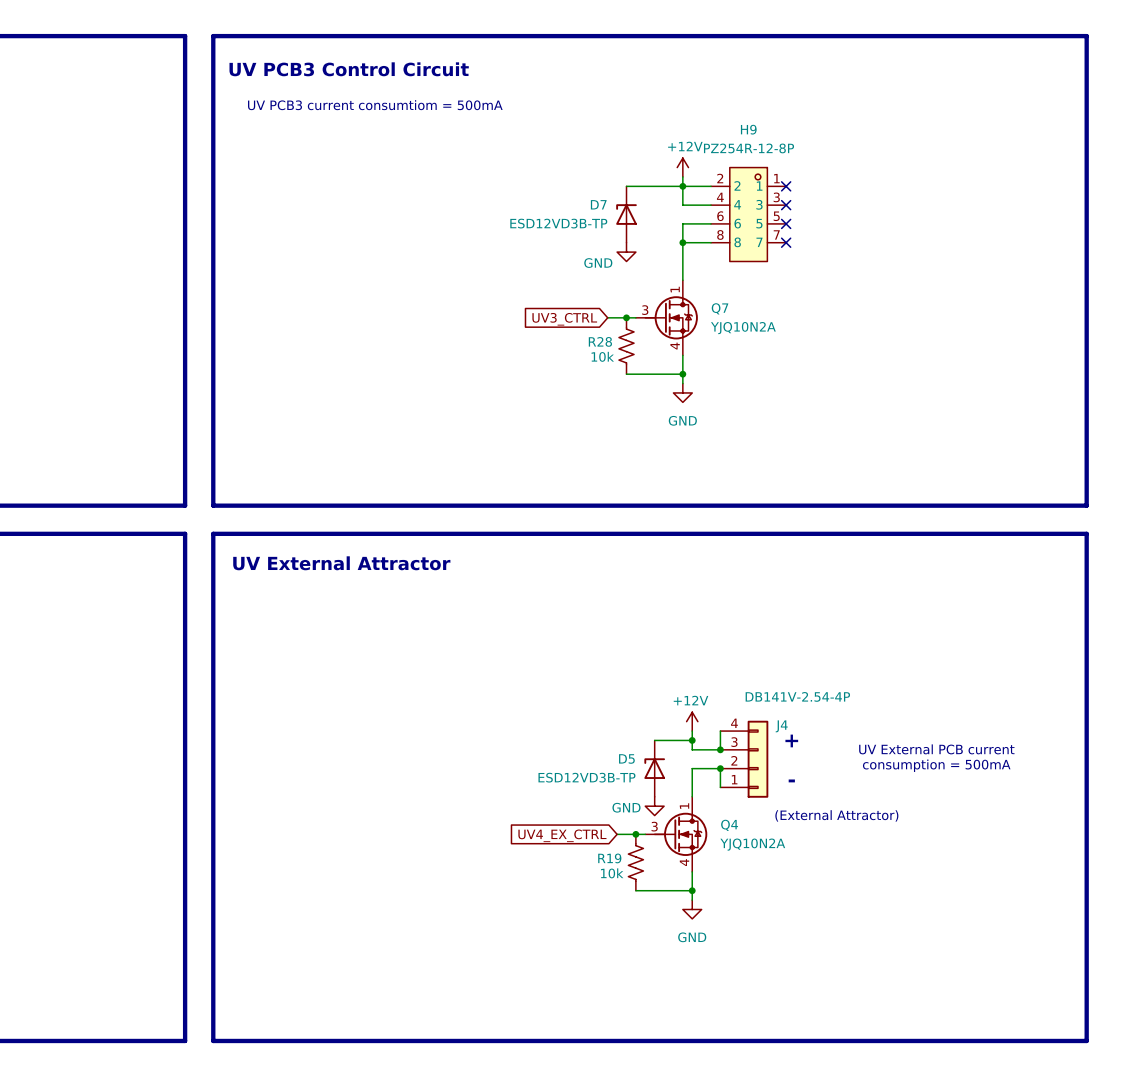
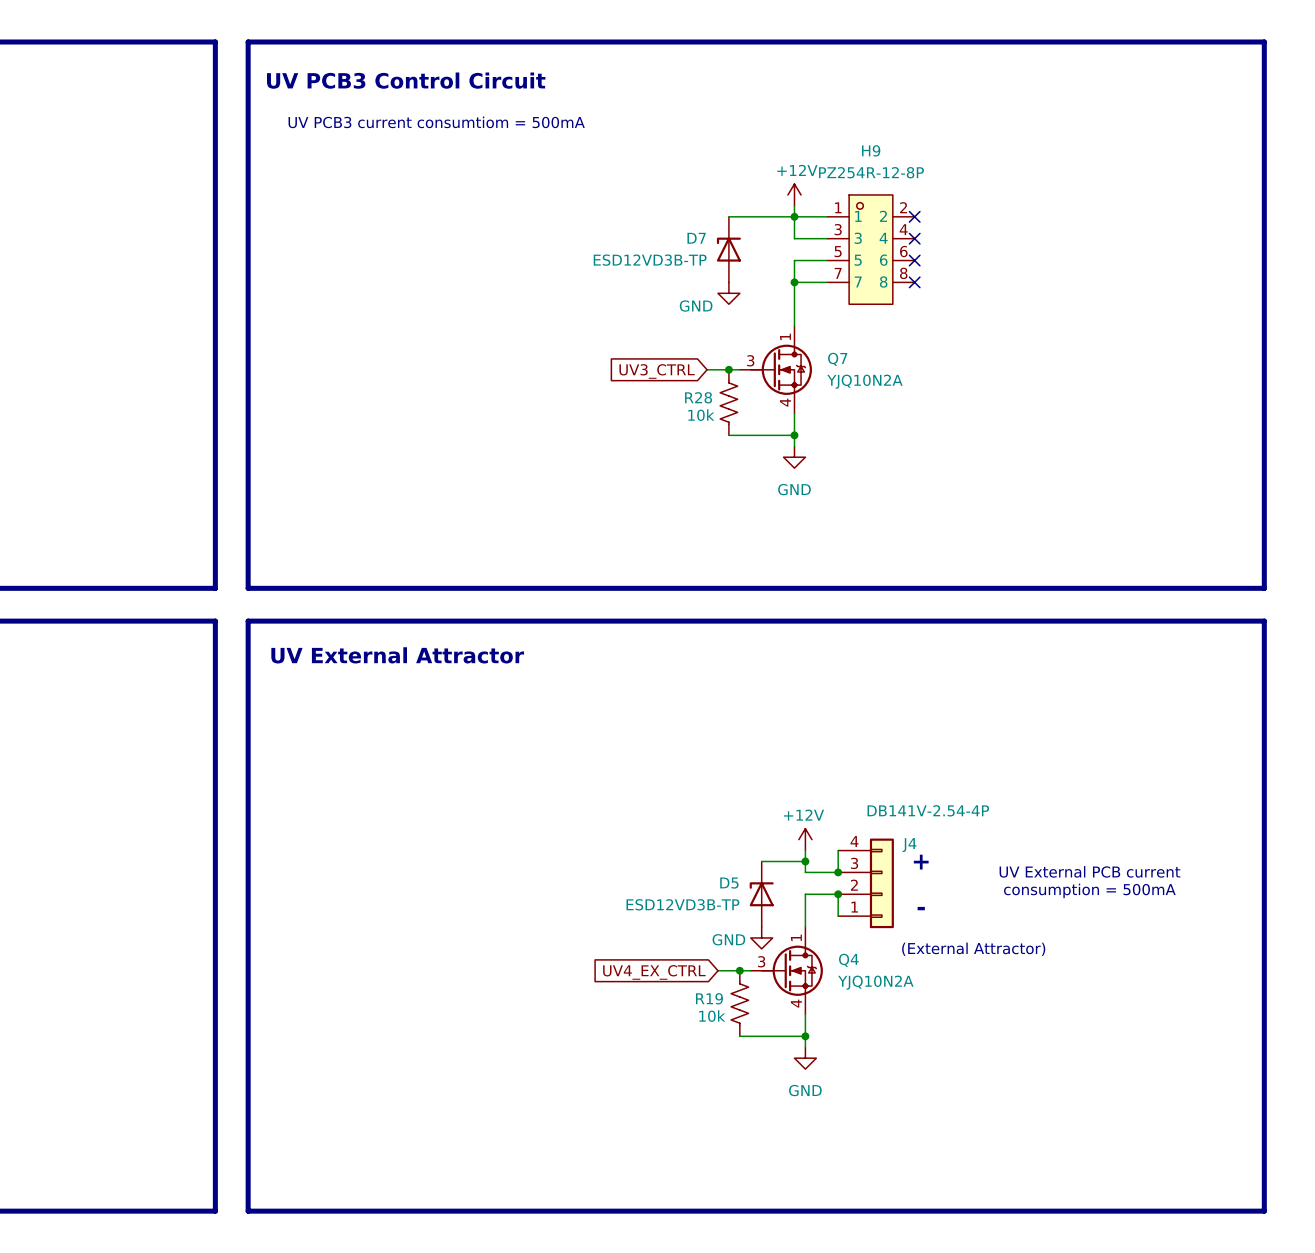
H9 flip: as is (748, 214) -> left-right (870, 249)

